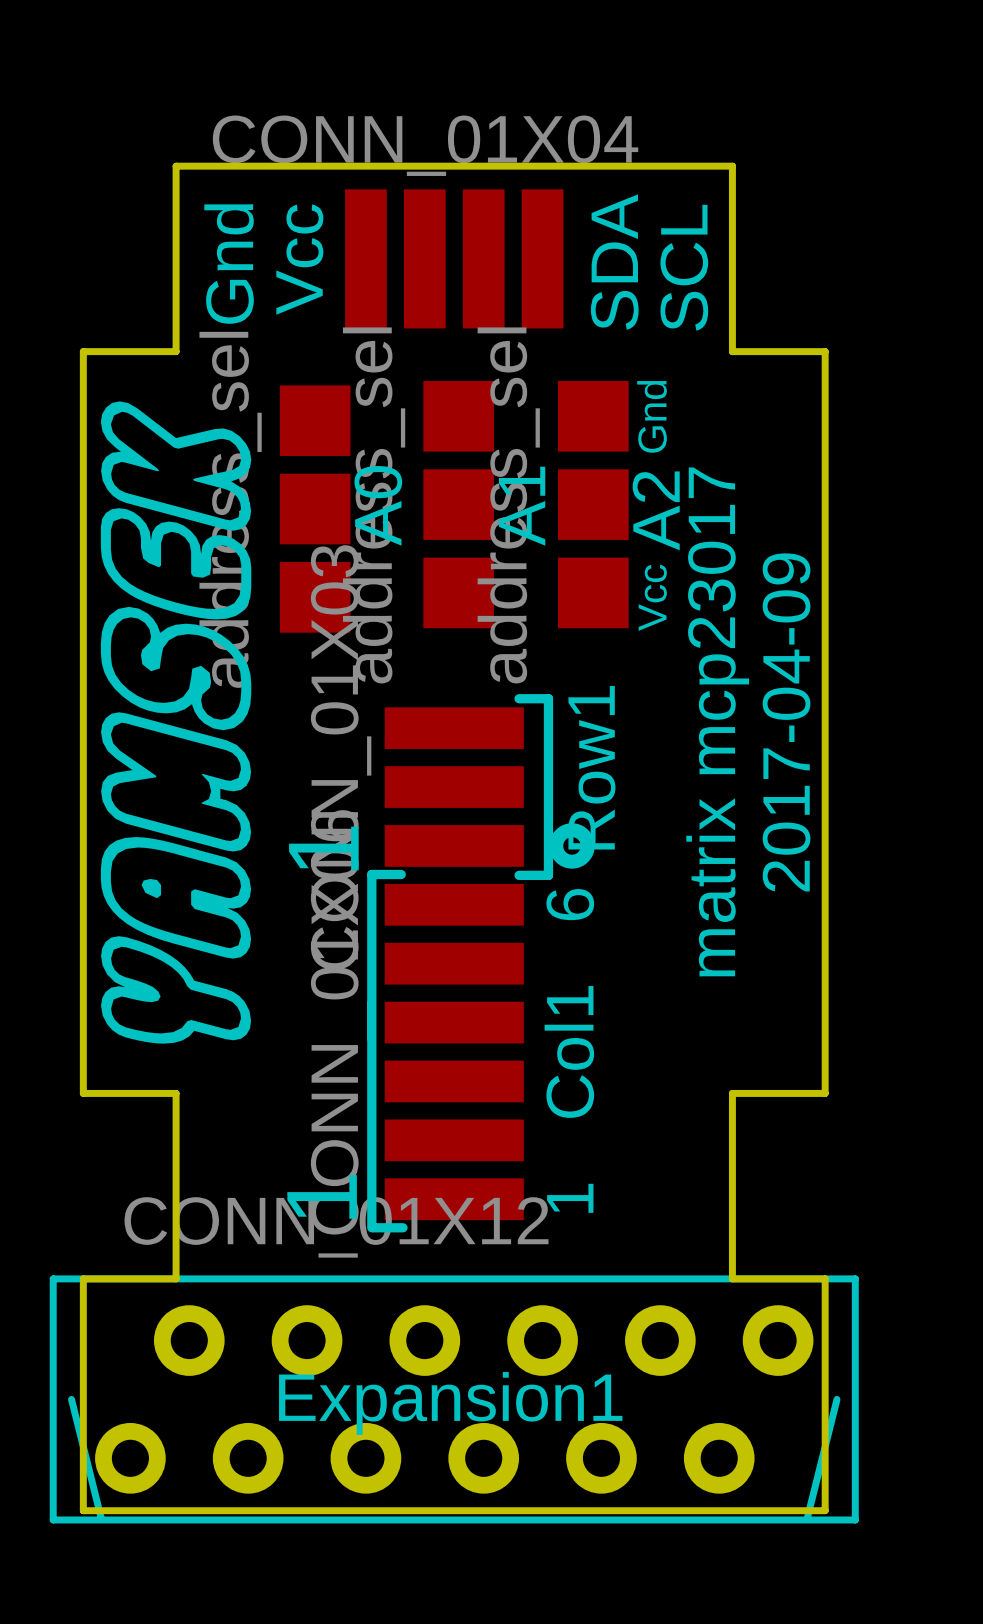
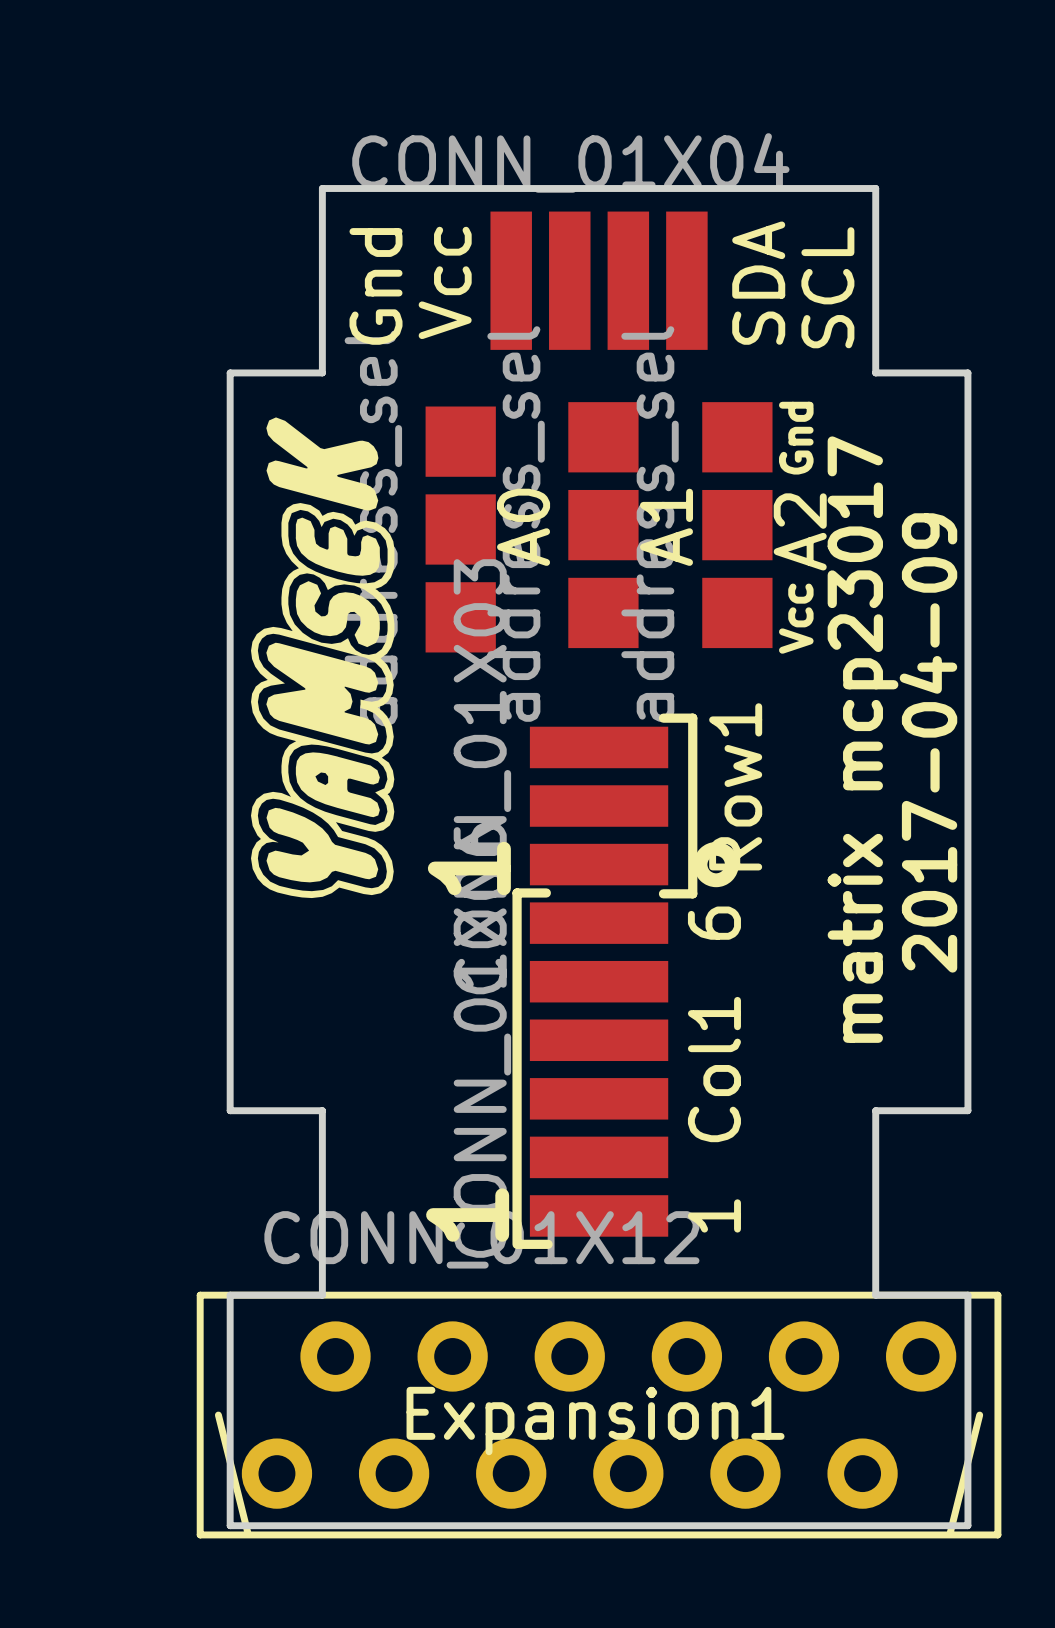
drawing: none -> [251, 417, 395, 899]
drawing: [100, 401, 252, 1044] -> none

